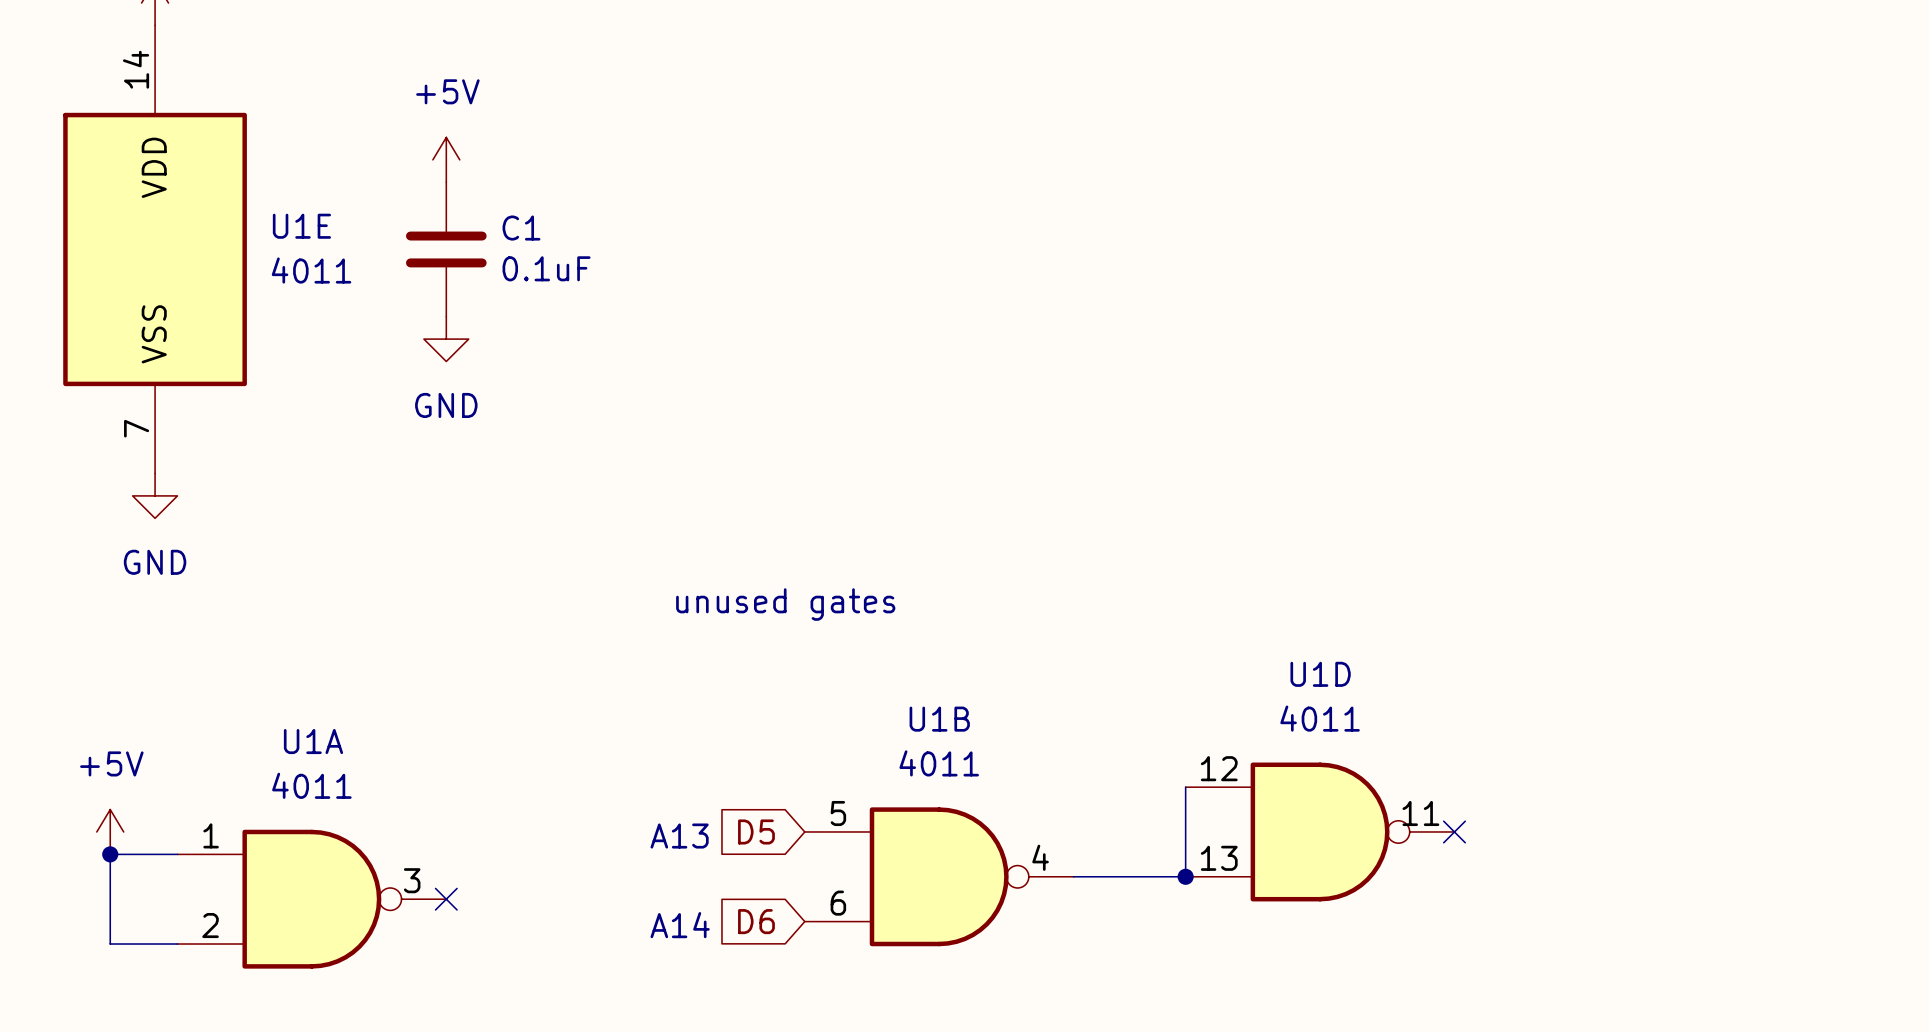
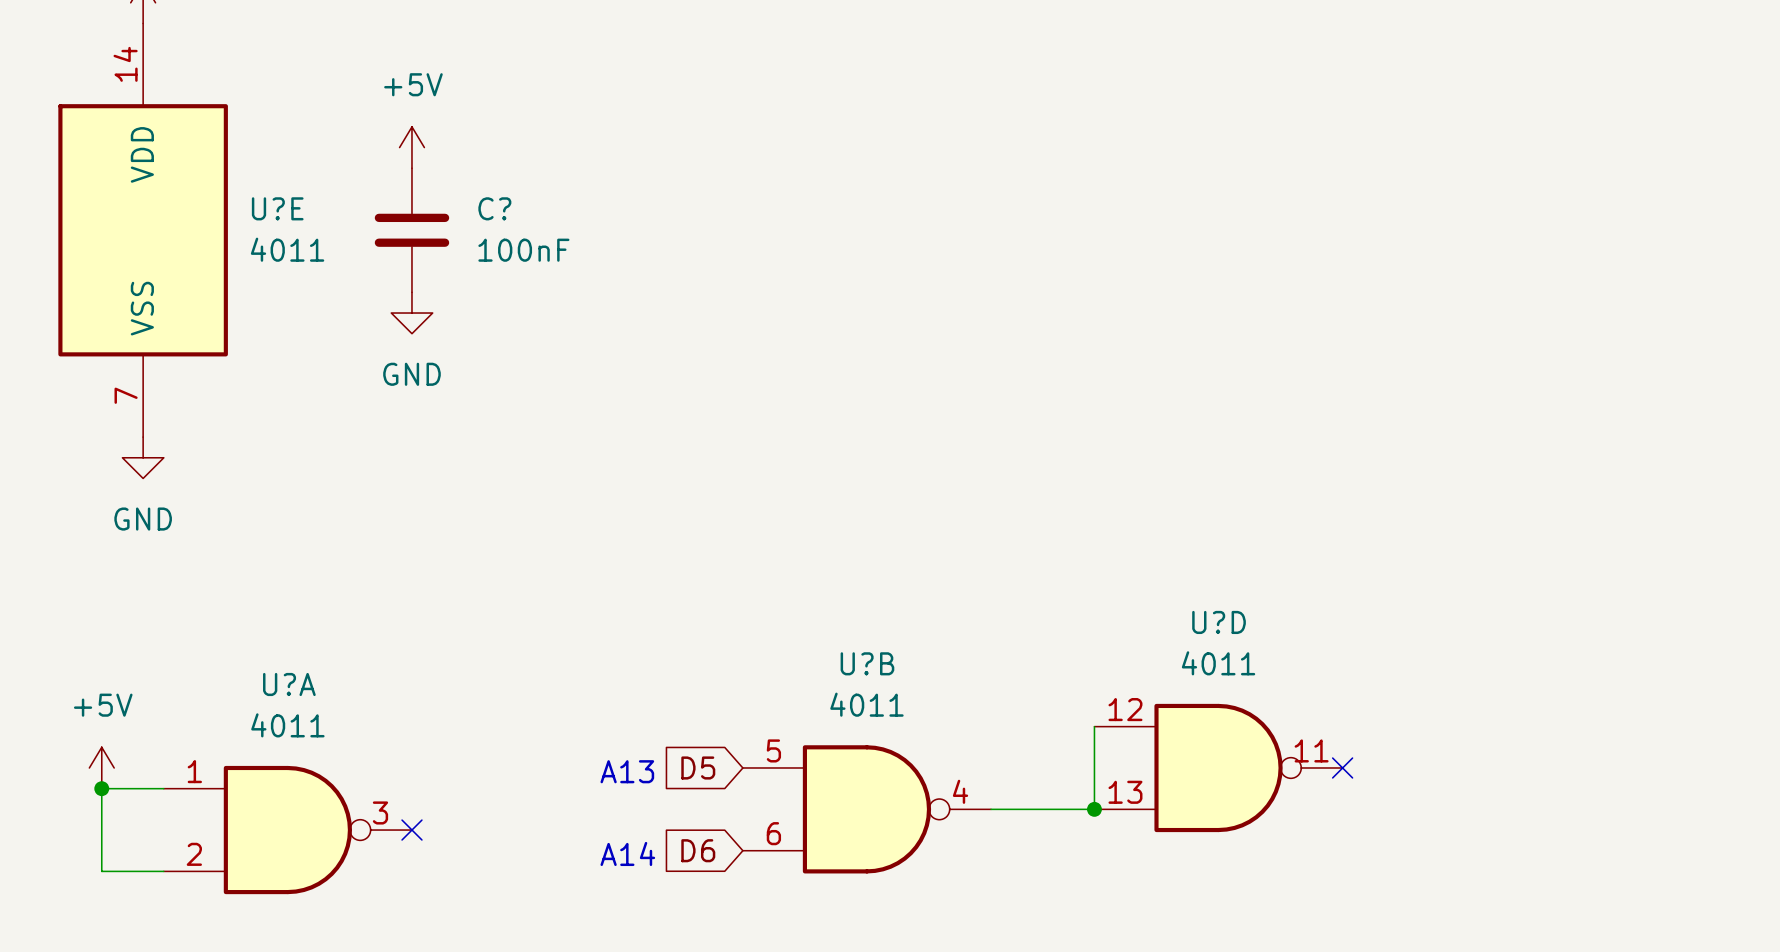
U1E name: U1E (301, 226) -> U?E (277, 208)
C1 name: C1 (521, 228) -> C? (494, 208)
C1 value: 0.1uF (546, 268) -> 100nF (523, 250)
text: unused gates (785, 604) -> none
U1D name: U1D (1320, 674) -> U?D (1219, 622)
U1B name: U1B (939, 719) -> U?B (867, 663)
U1A name: U1A (313, 741) -> U?A (289, 684)

